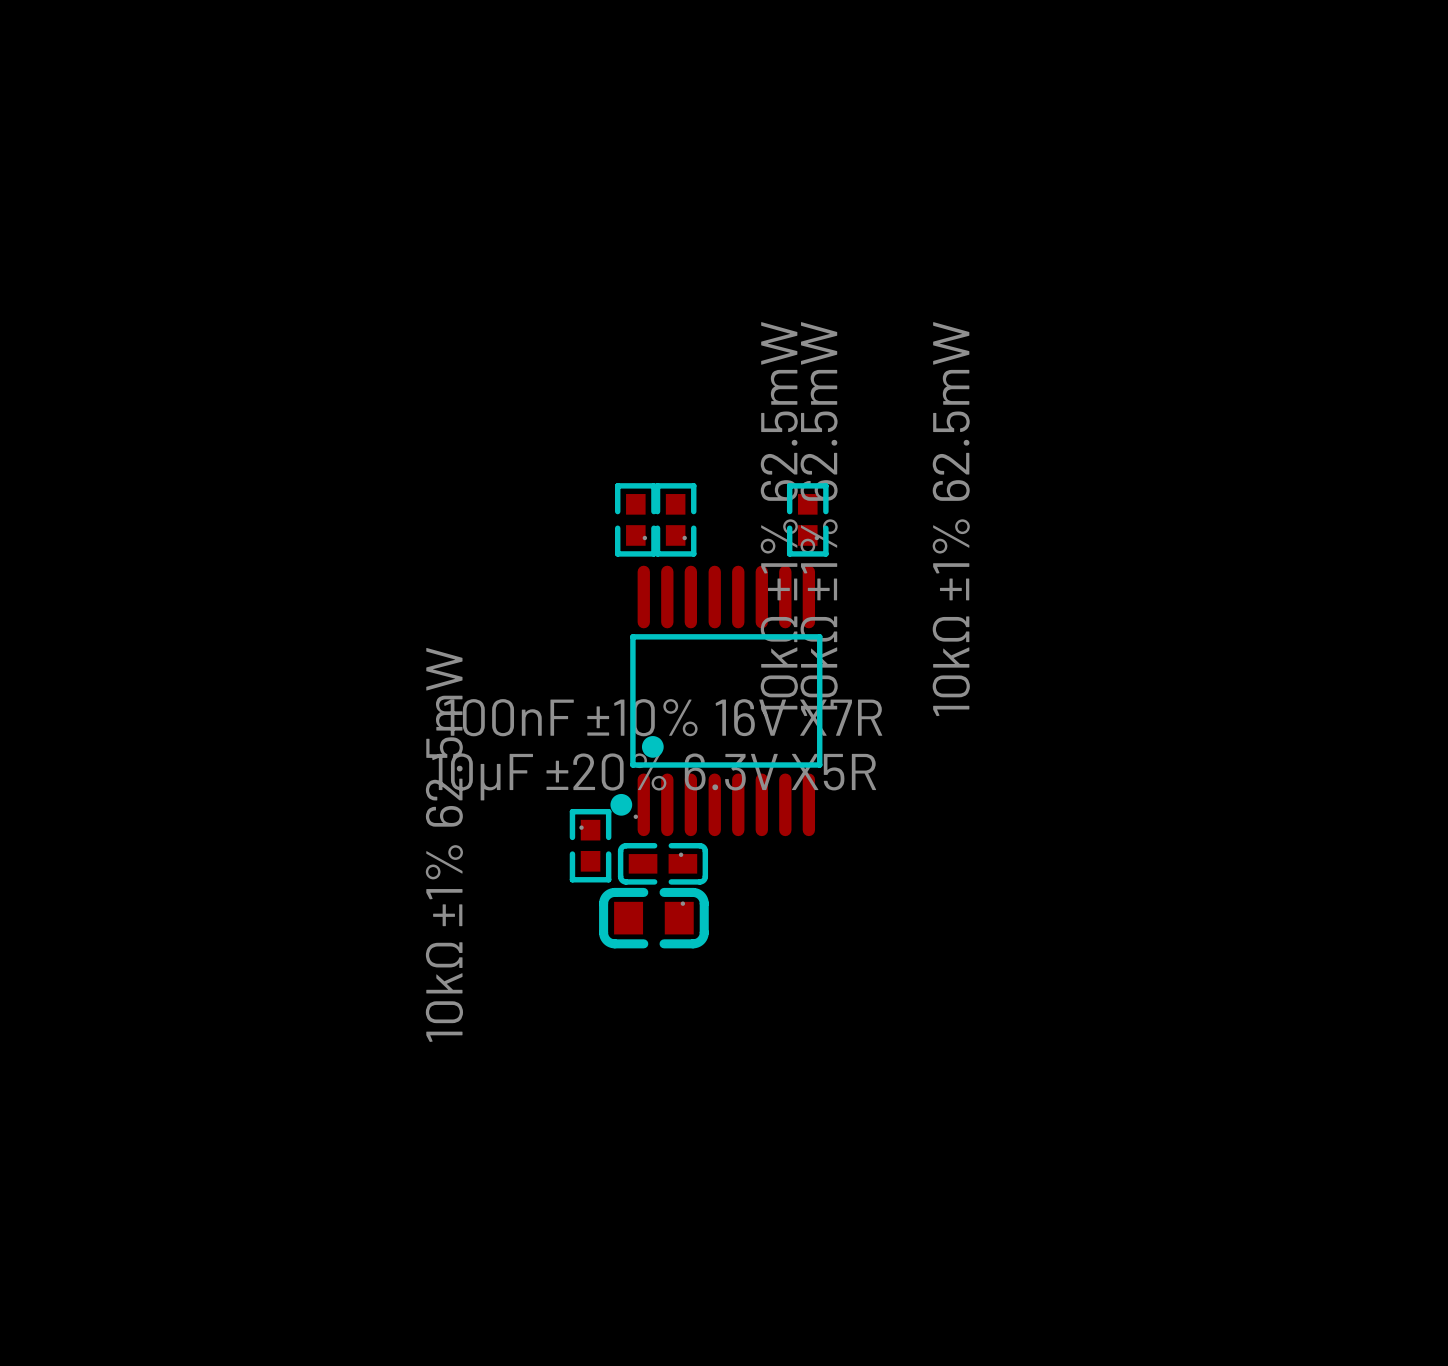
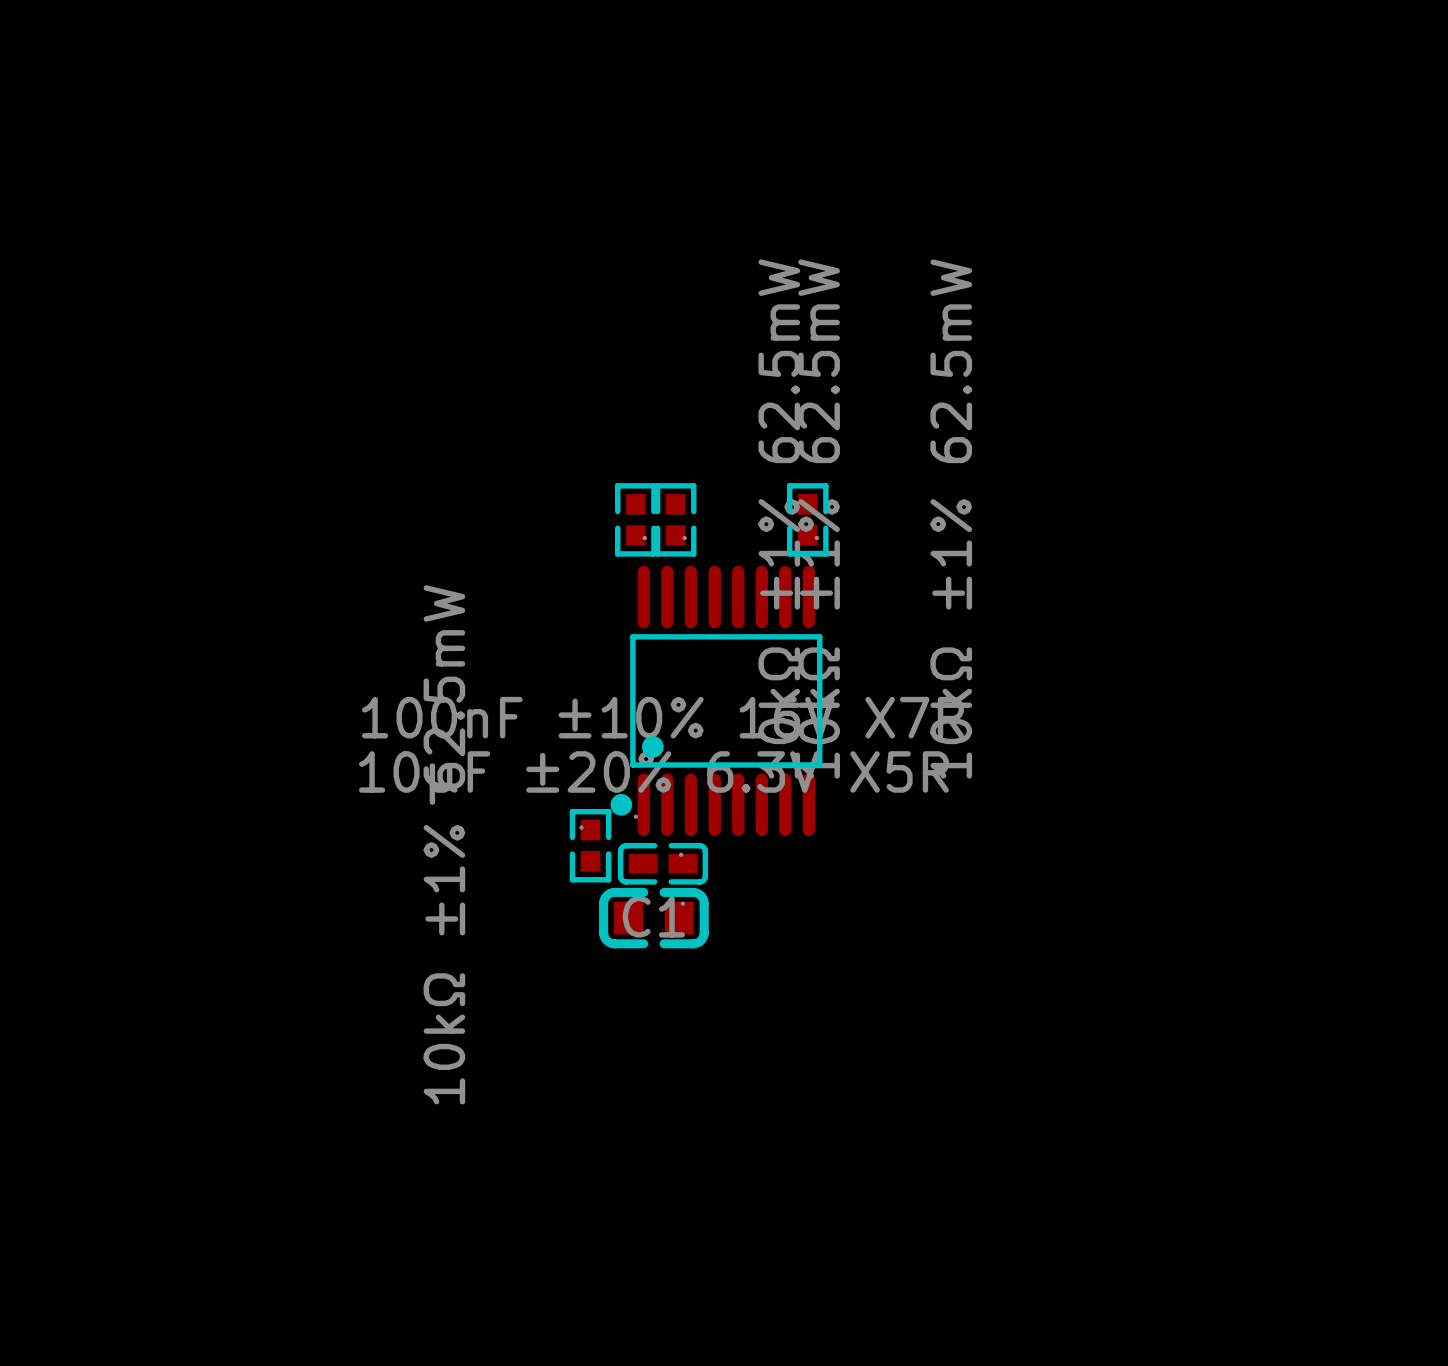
C1 name: none -> C1 (653, 916)

